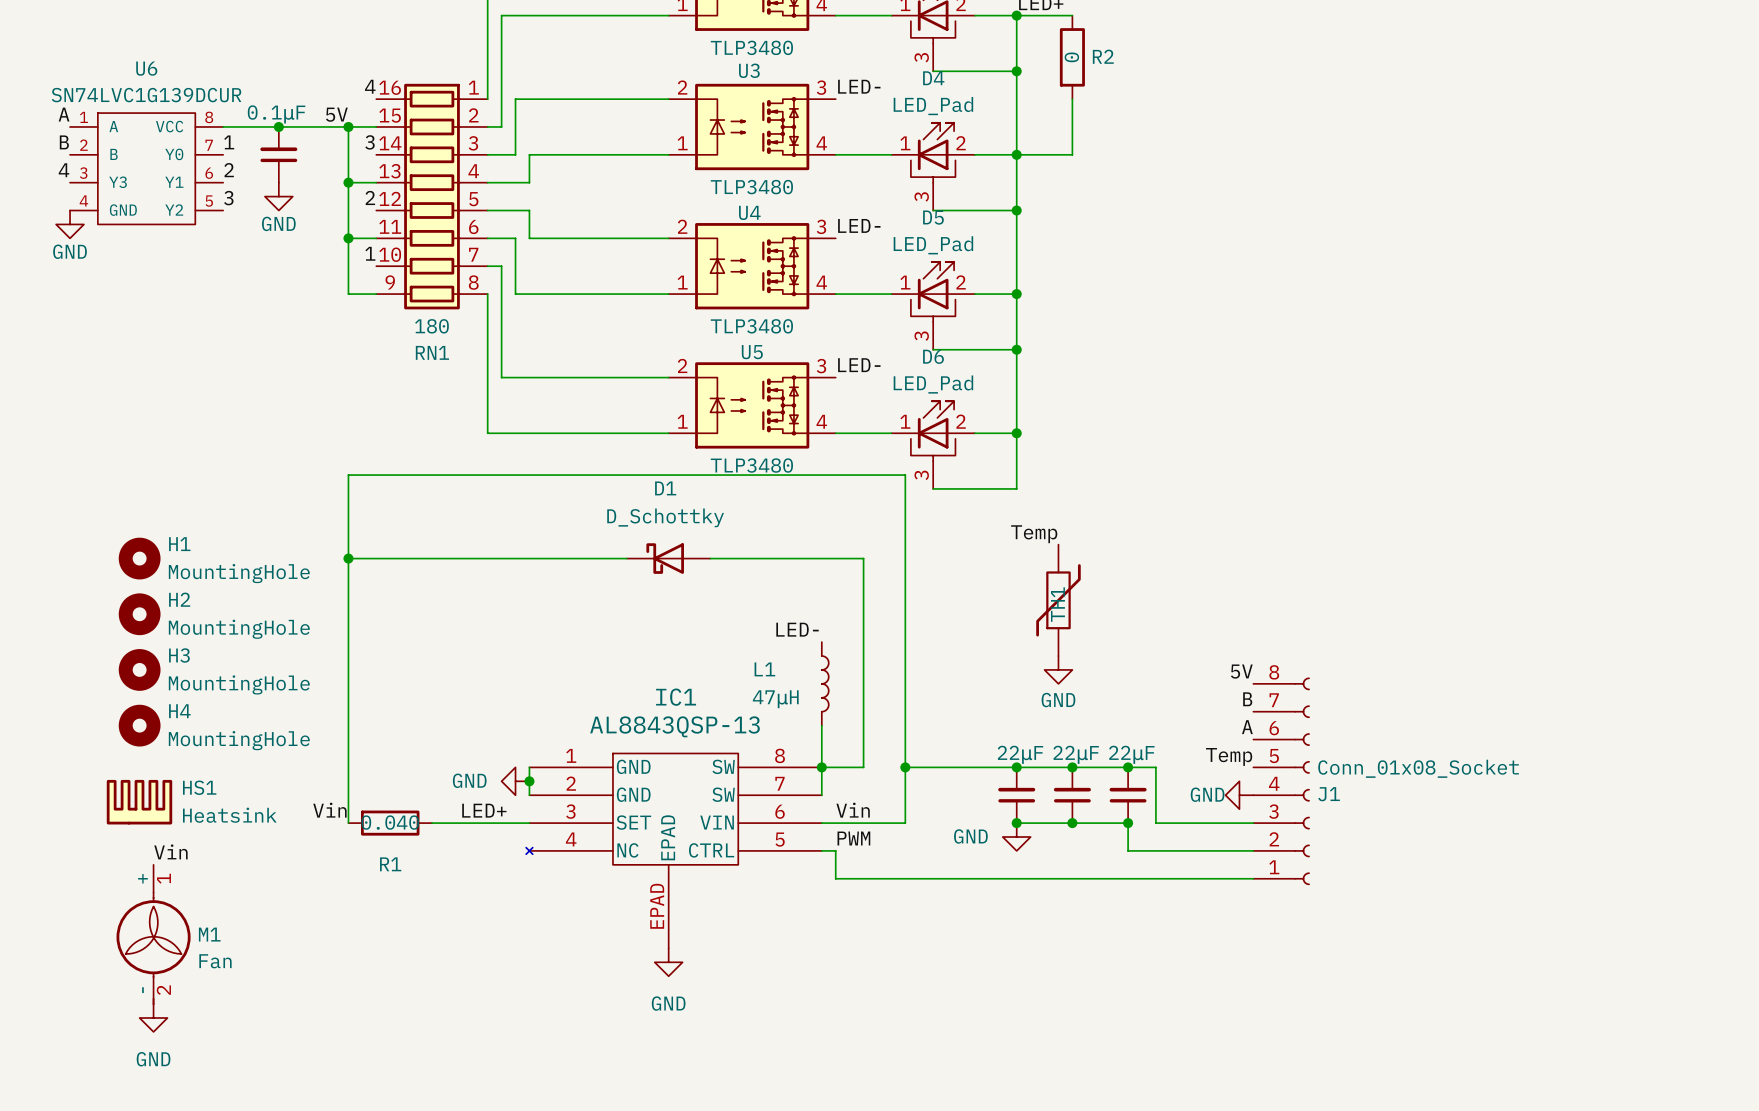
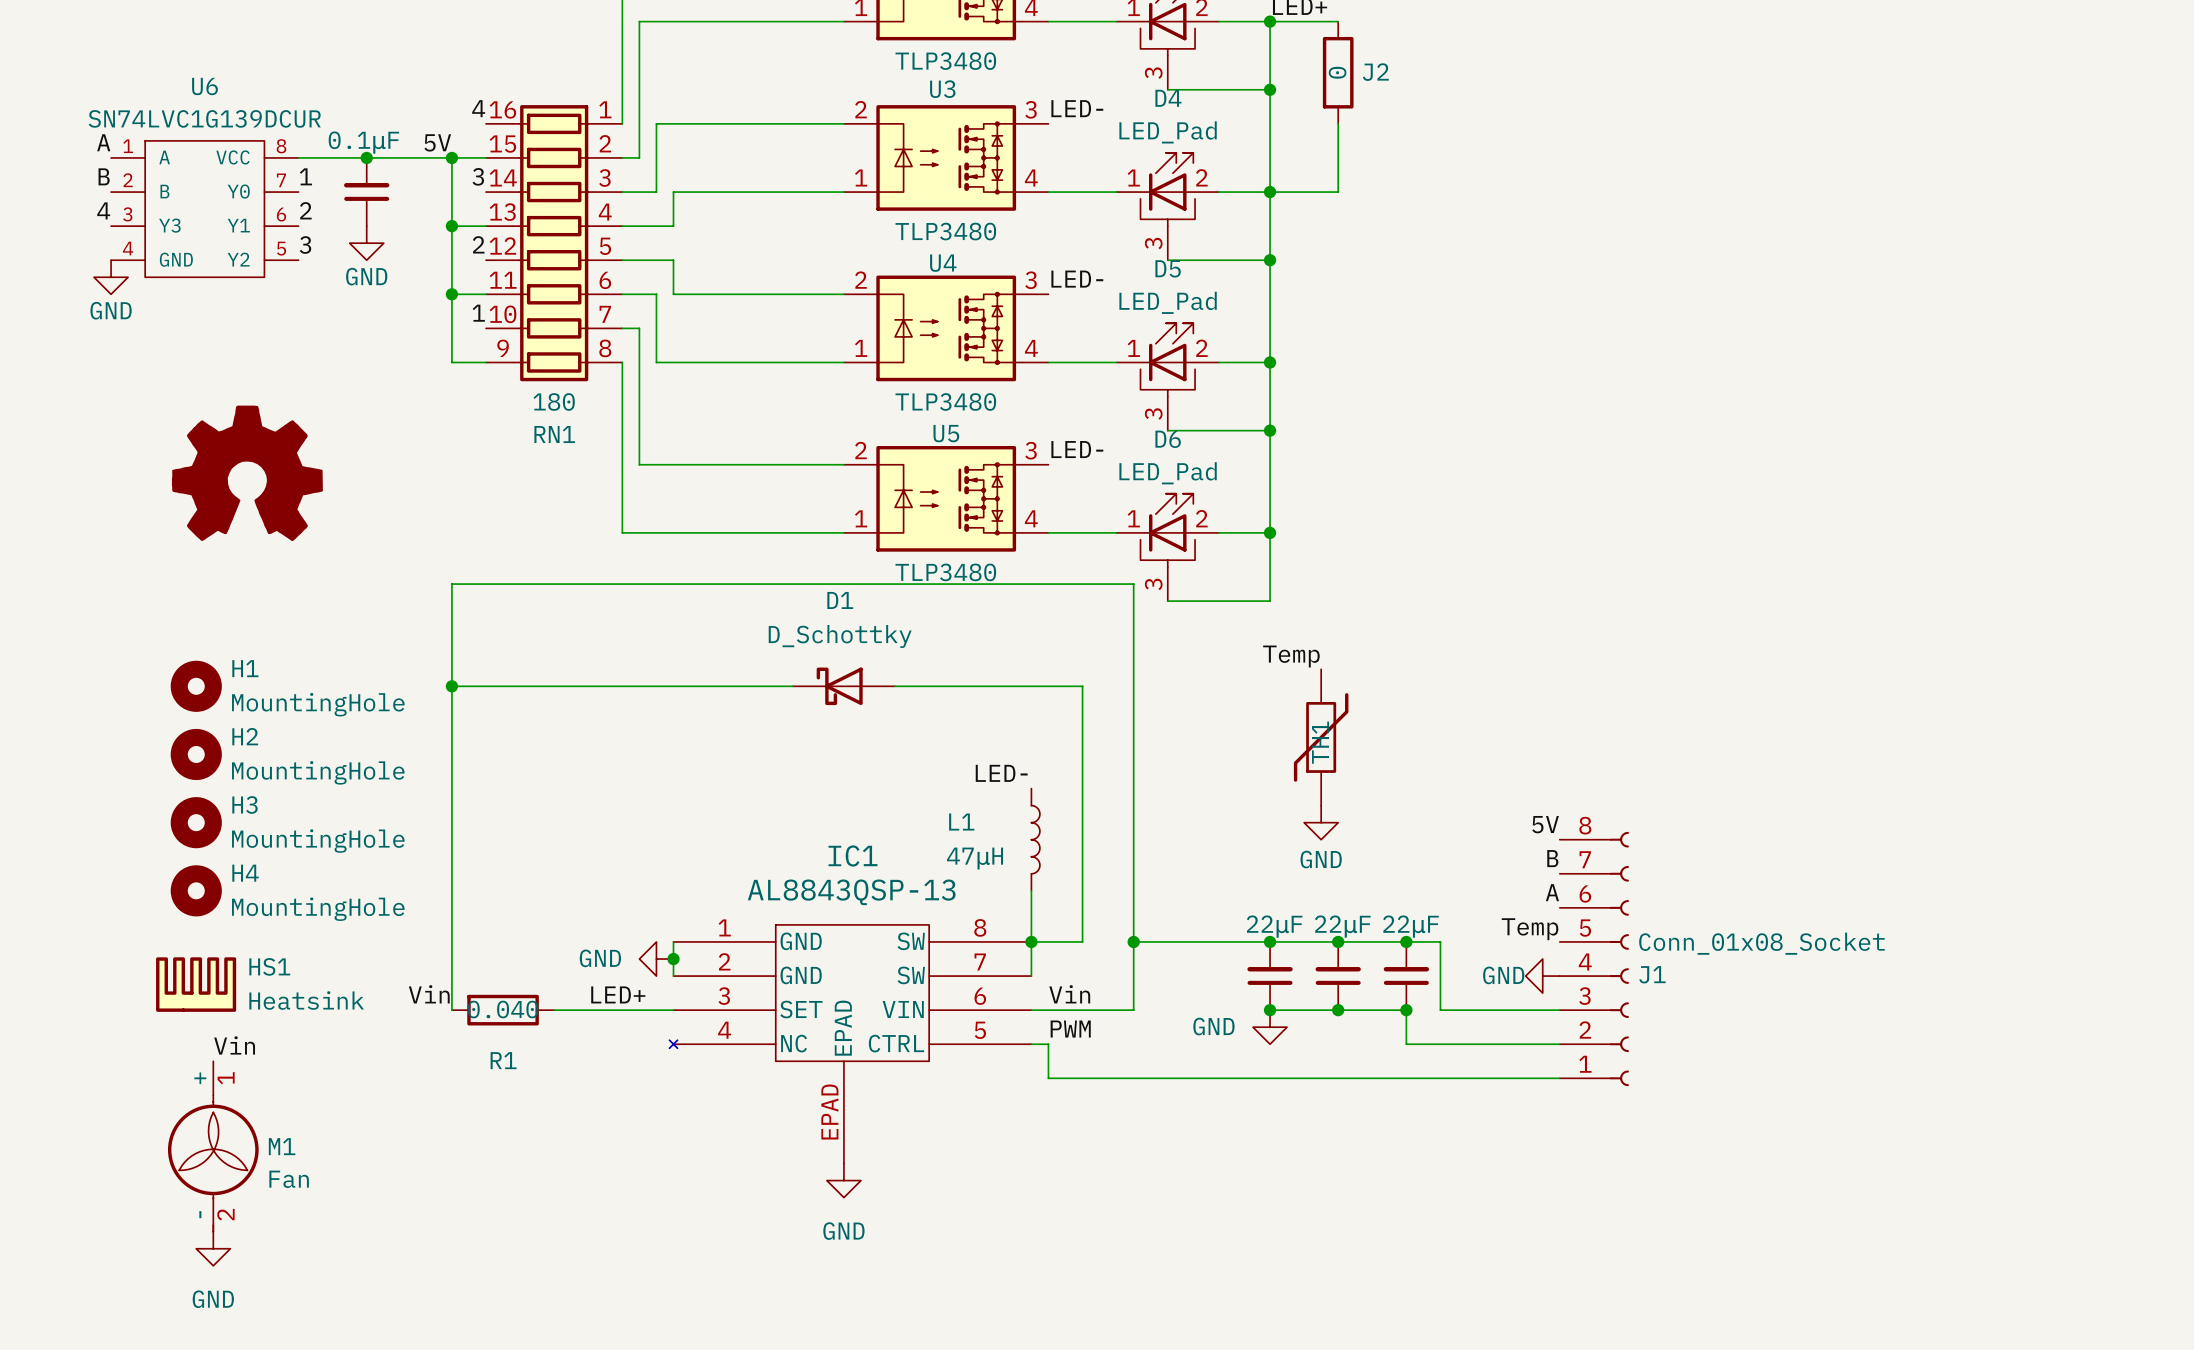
R2 name: R2 (1103, 56) -> J2 (1375, 72)
power symbol: none -> (247, 473)

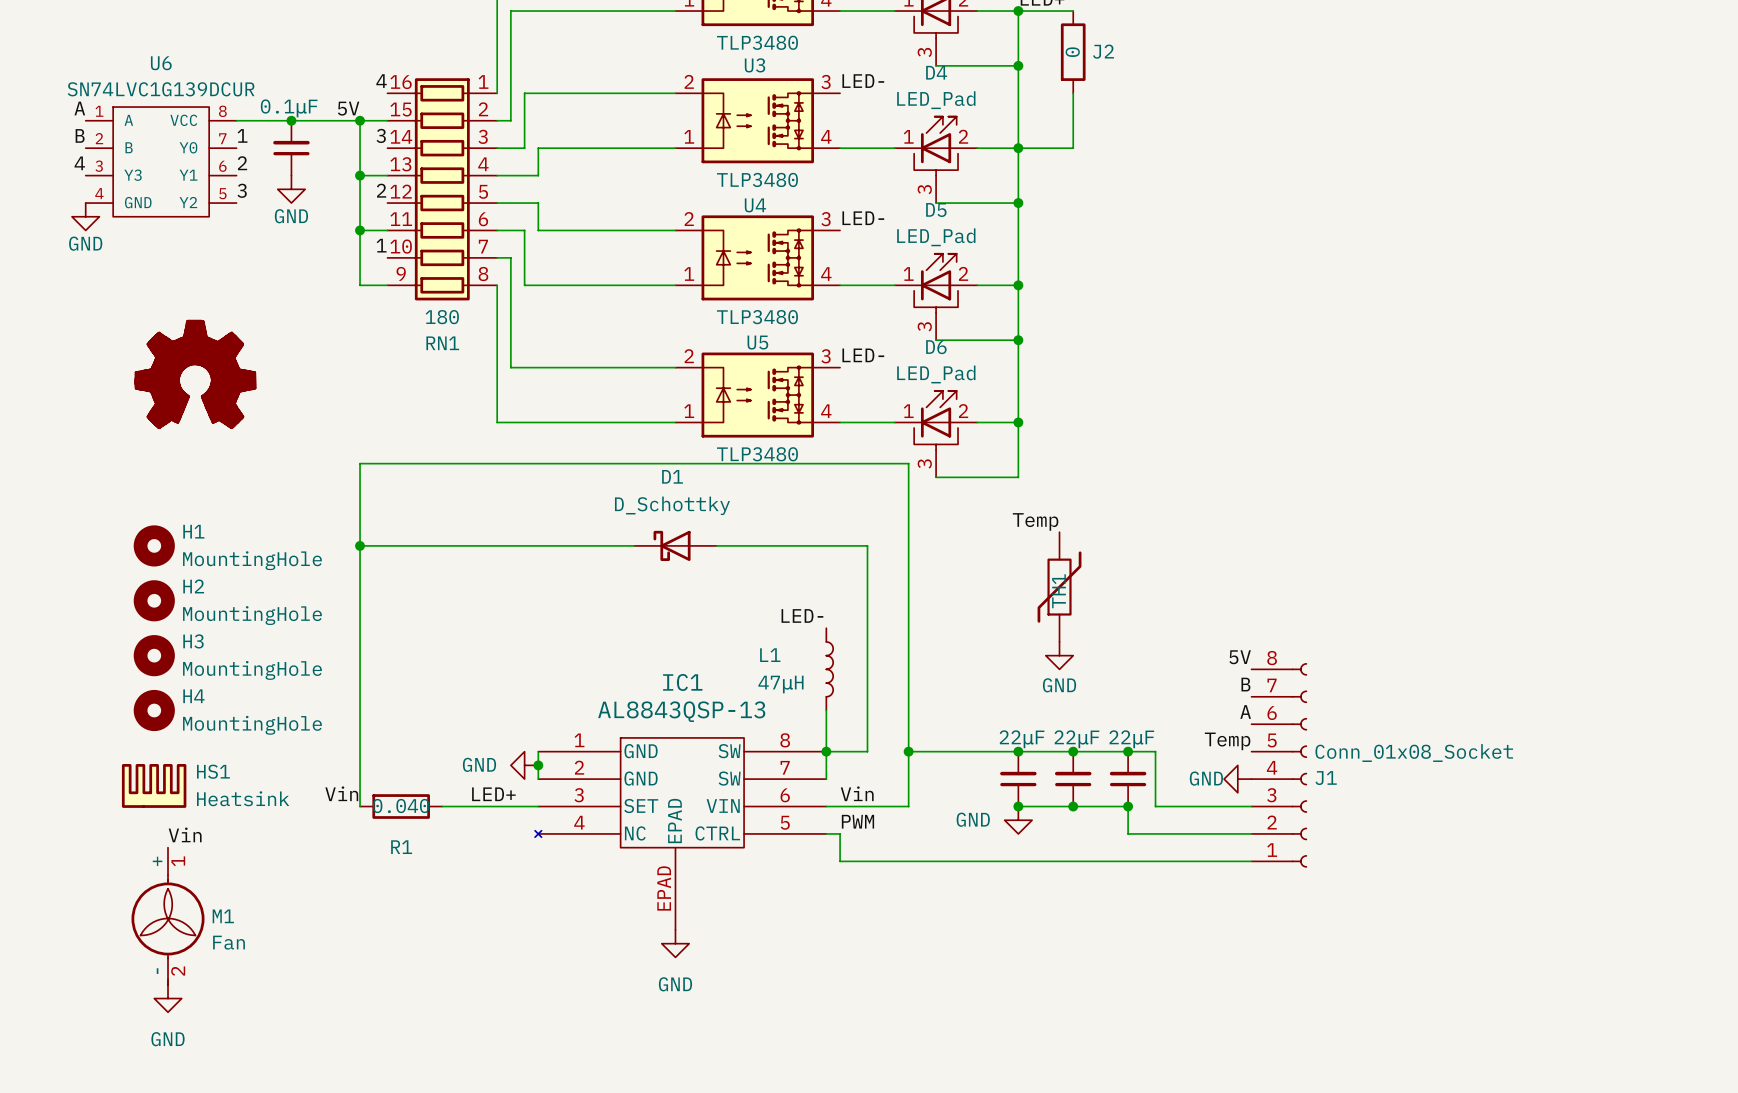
power symbol: (247, 473) -> none
part: none -> (195, 374)

